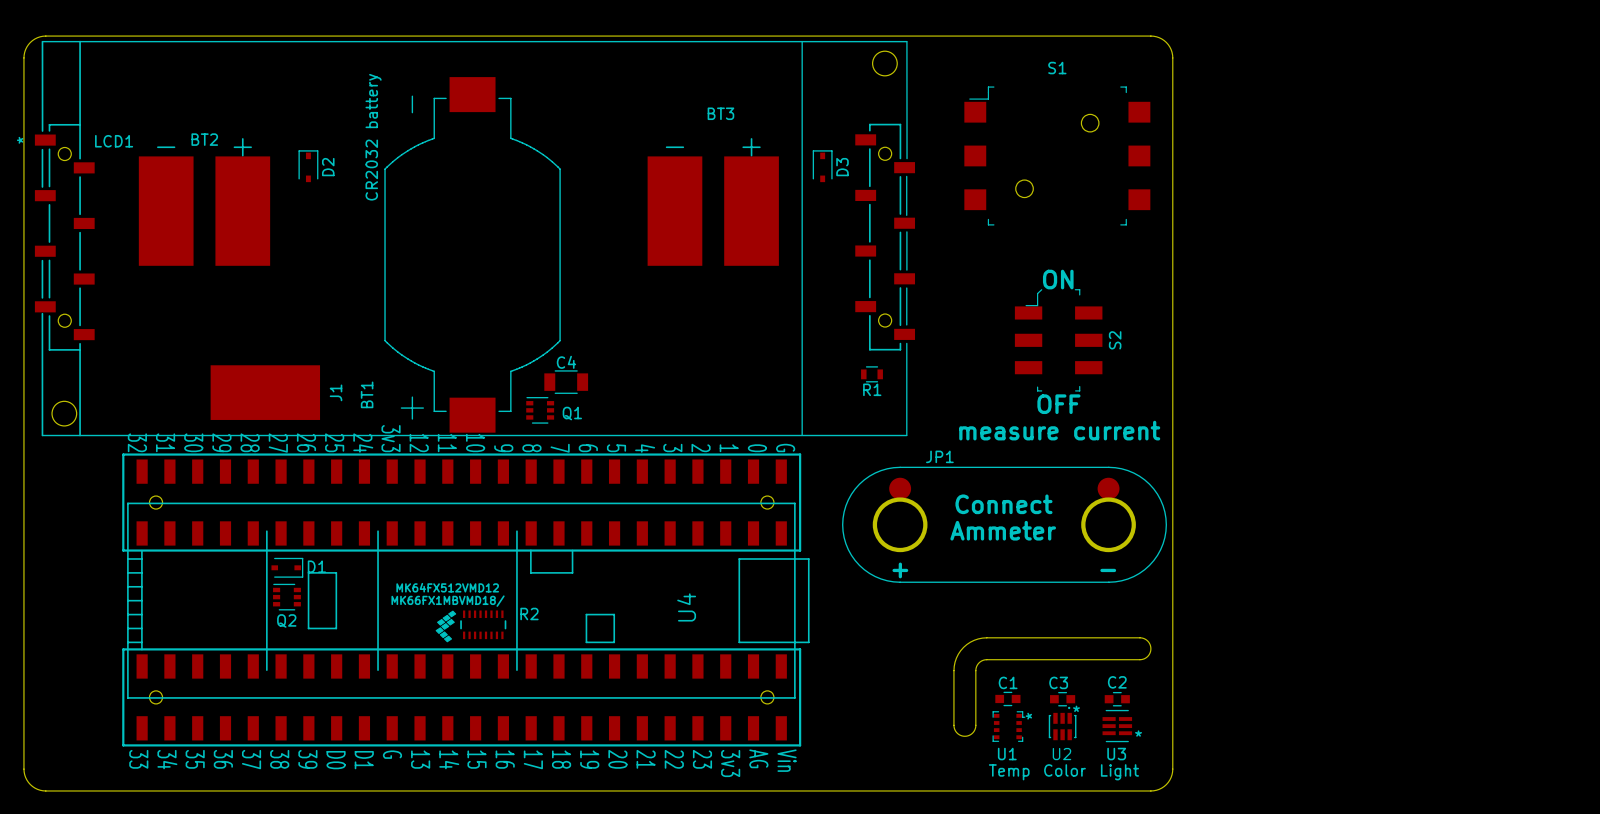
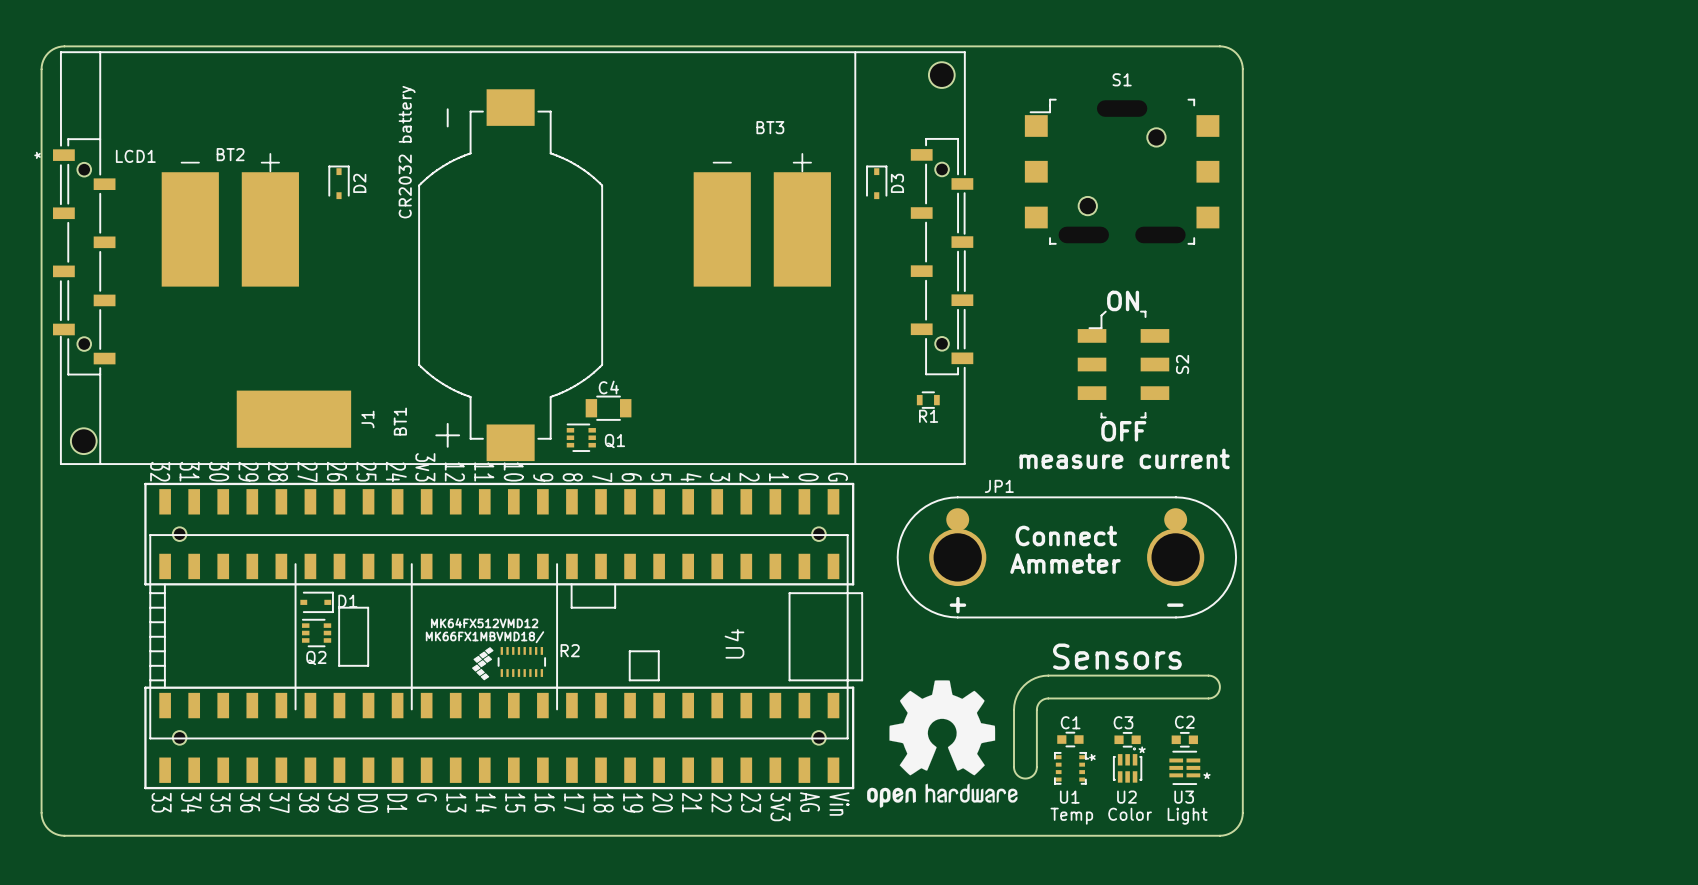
text: none -> Sensors (1117, 656)
drawing: none -> [867, 680, 1018, 808]

